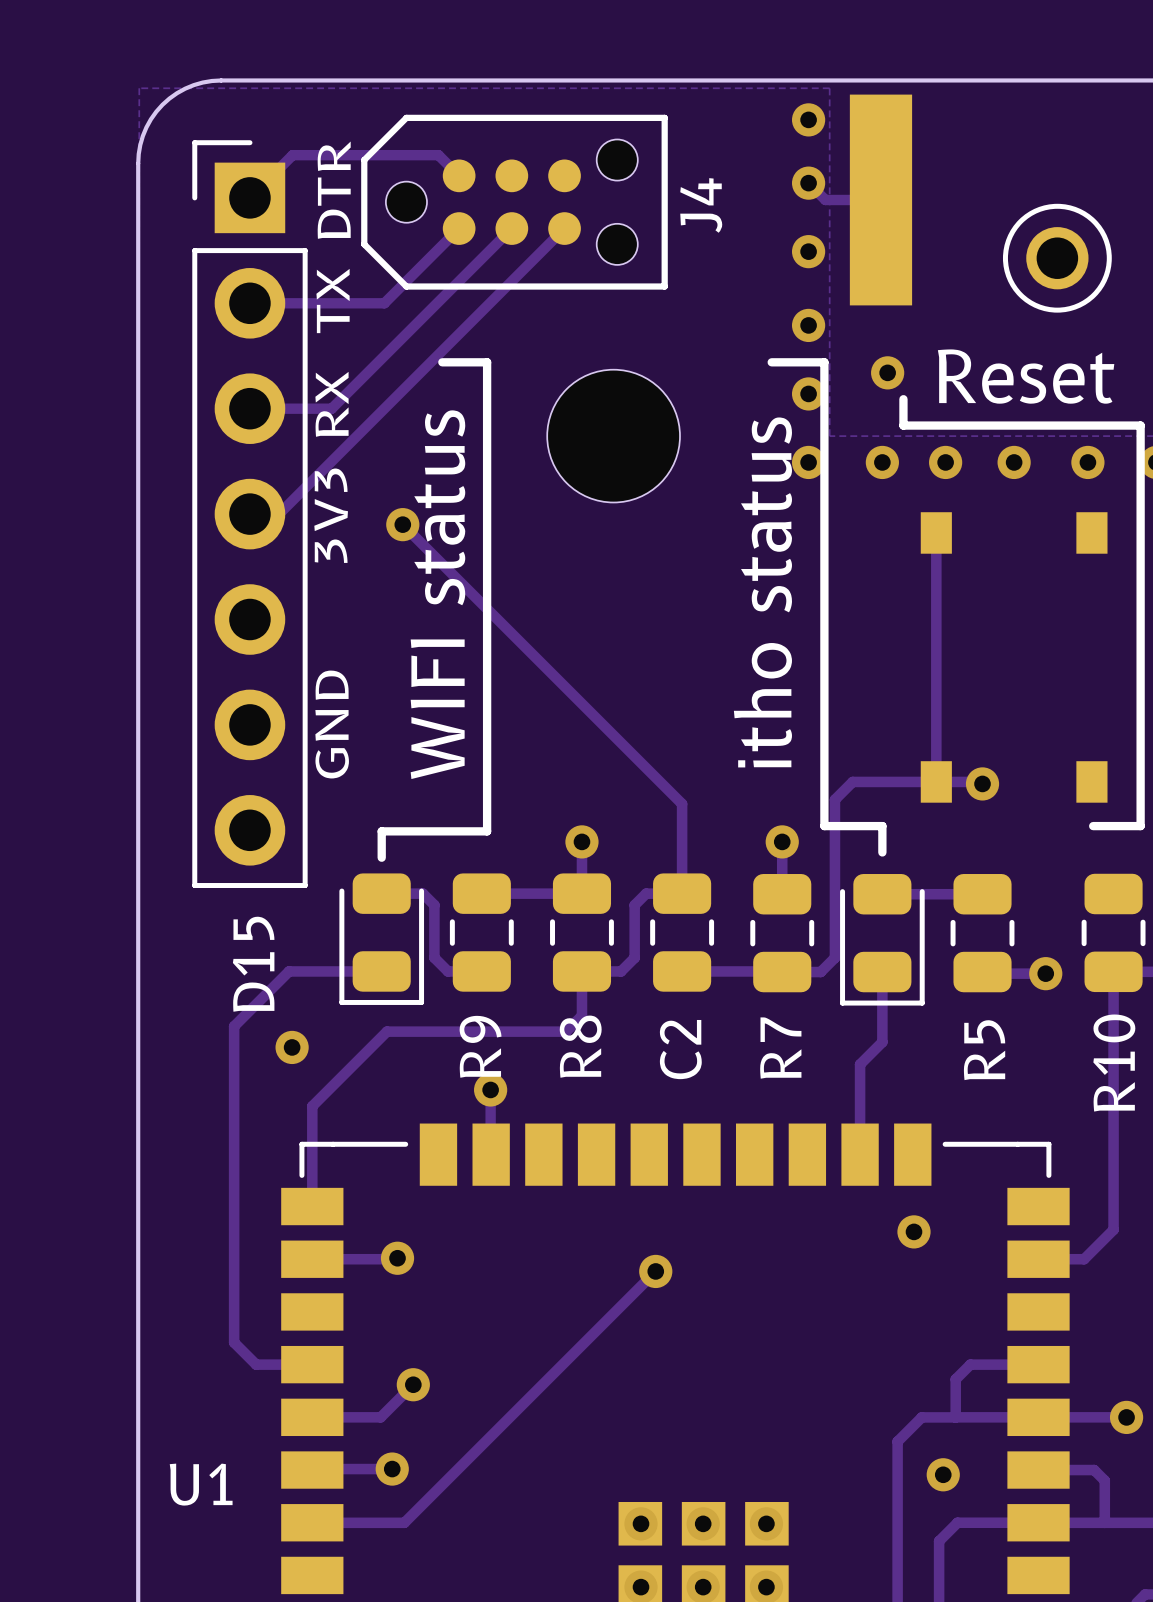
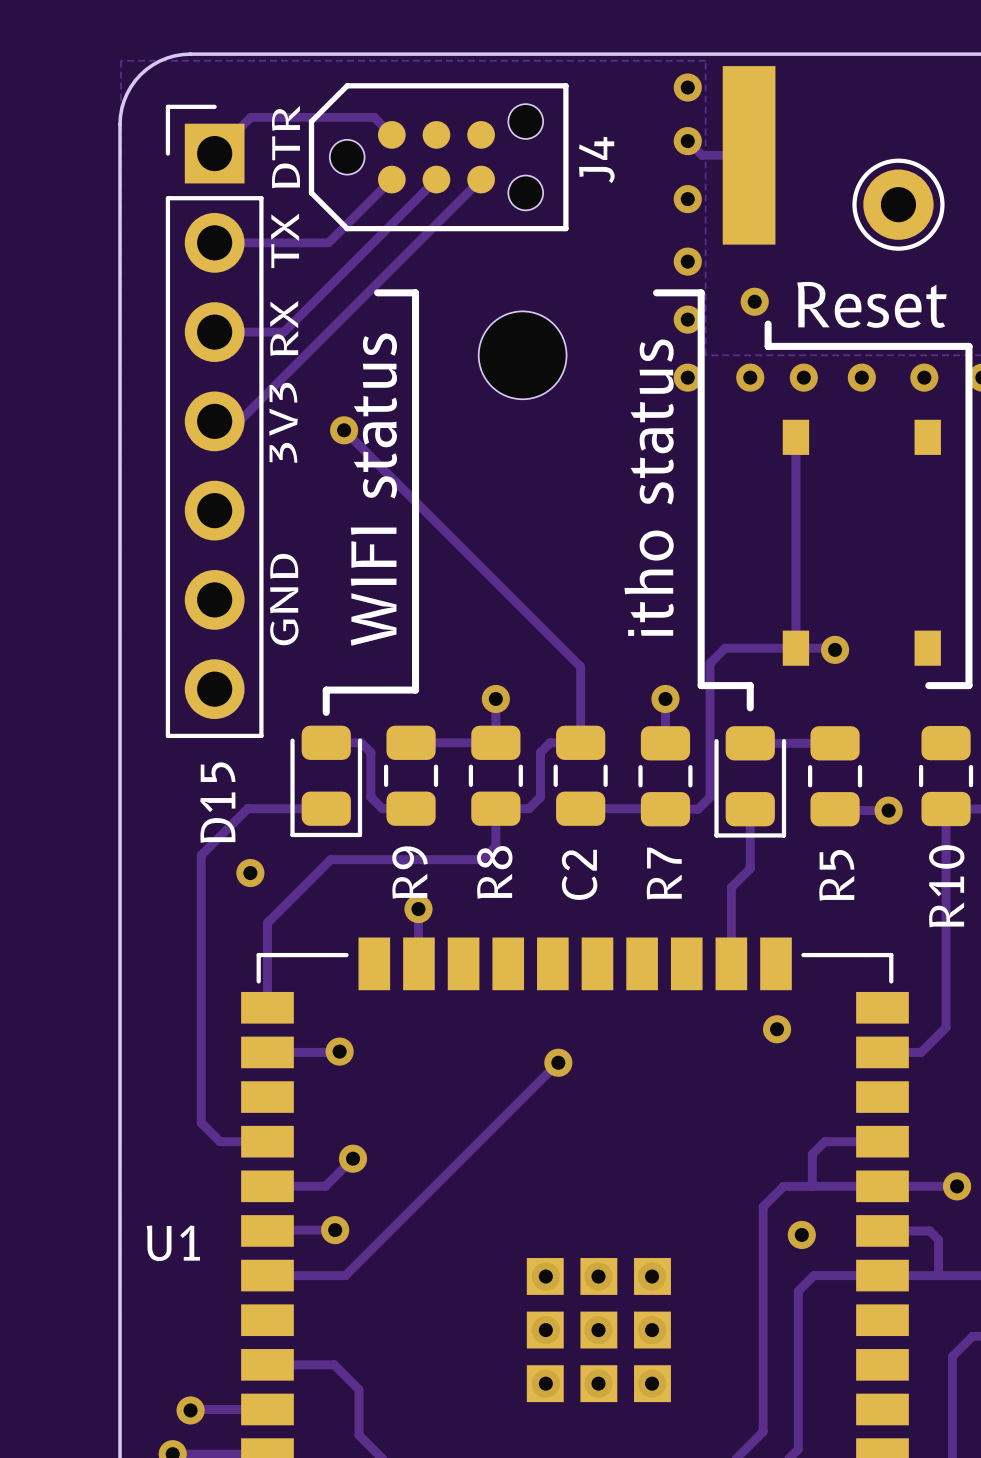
part footprint: [1002, 203, 1112, 313] -> [852, 158, 945, 251]
part footprint: [547, 369, 680, 503] -> [478, 311, 567, 400]

